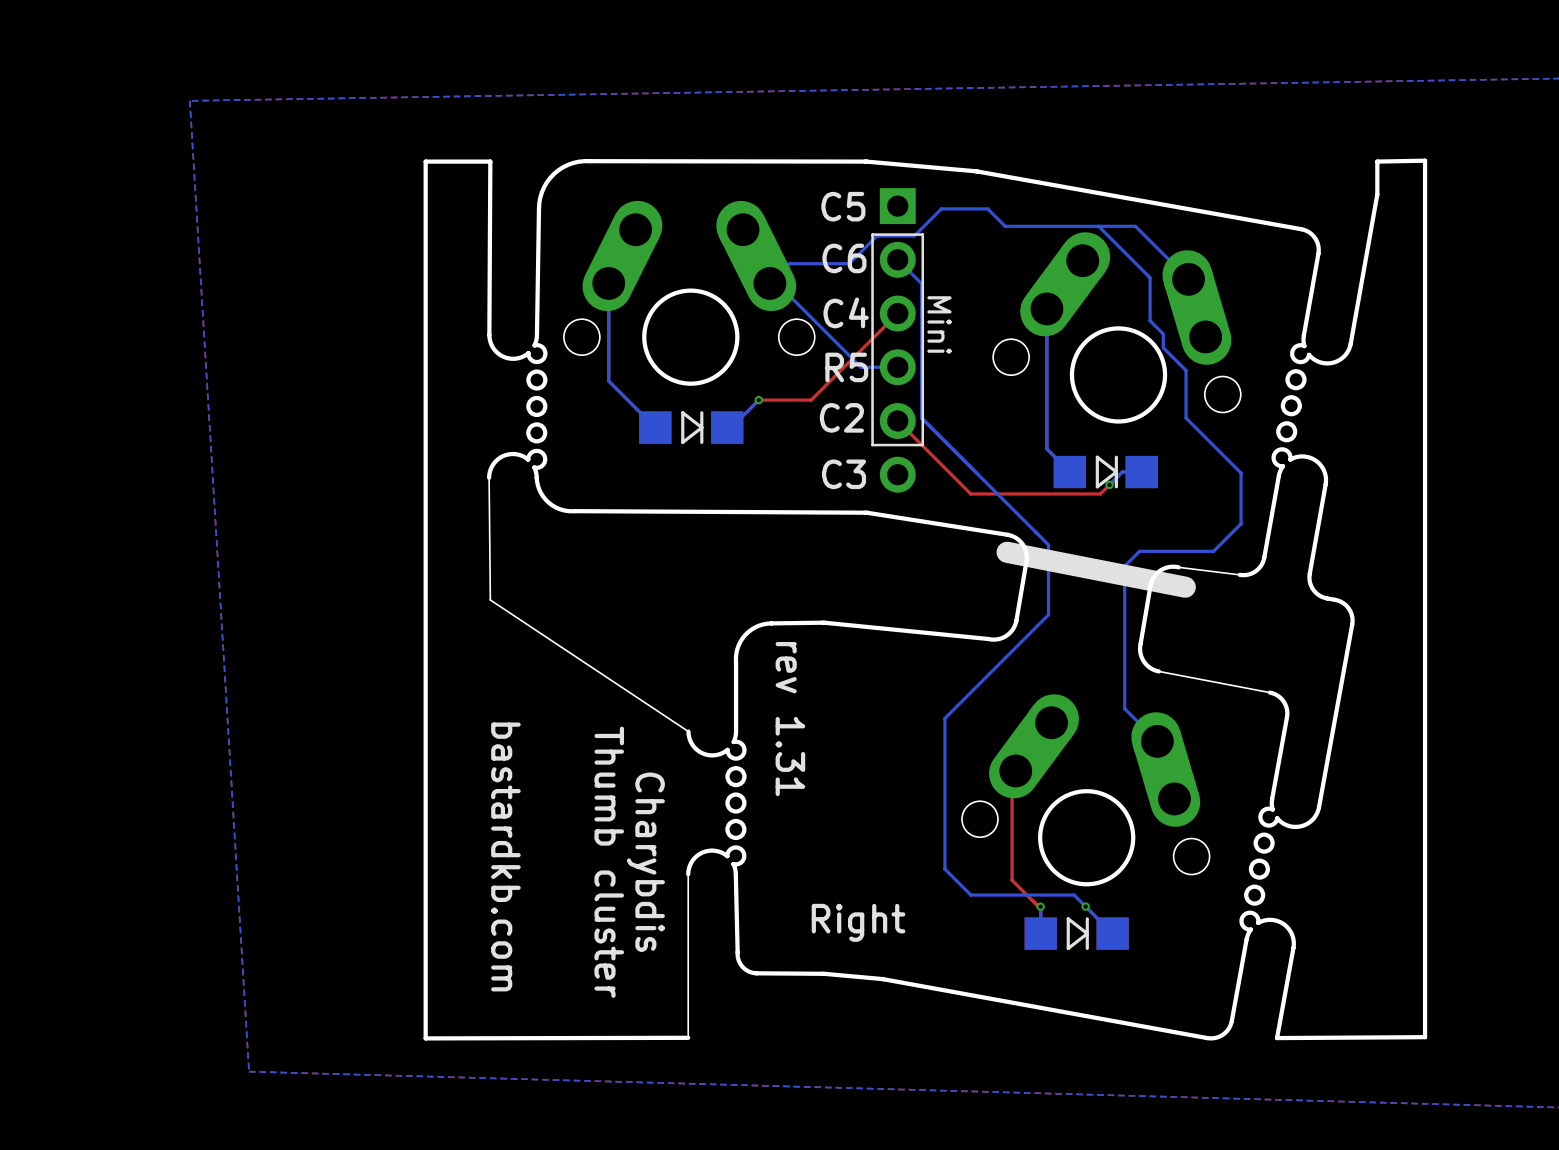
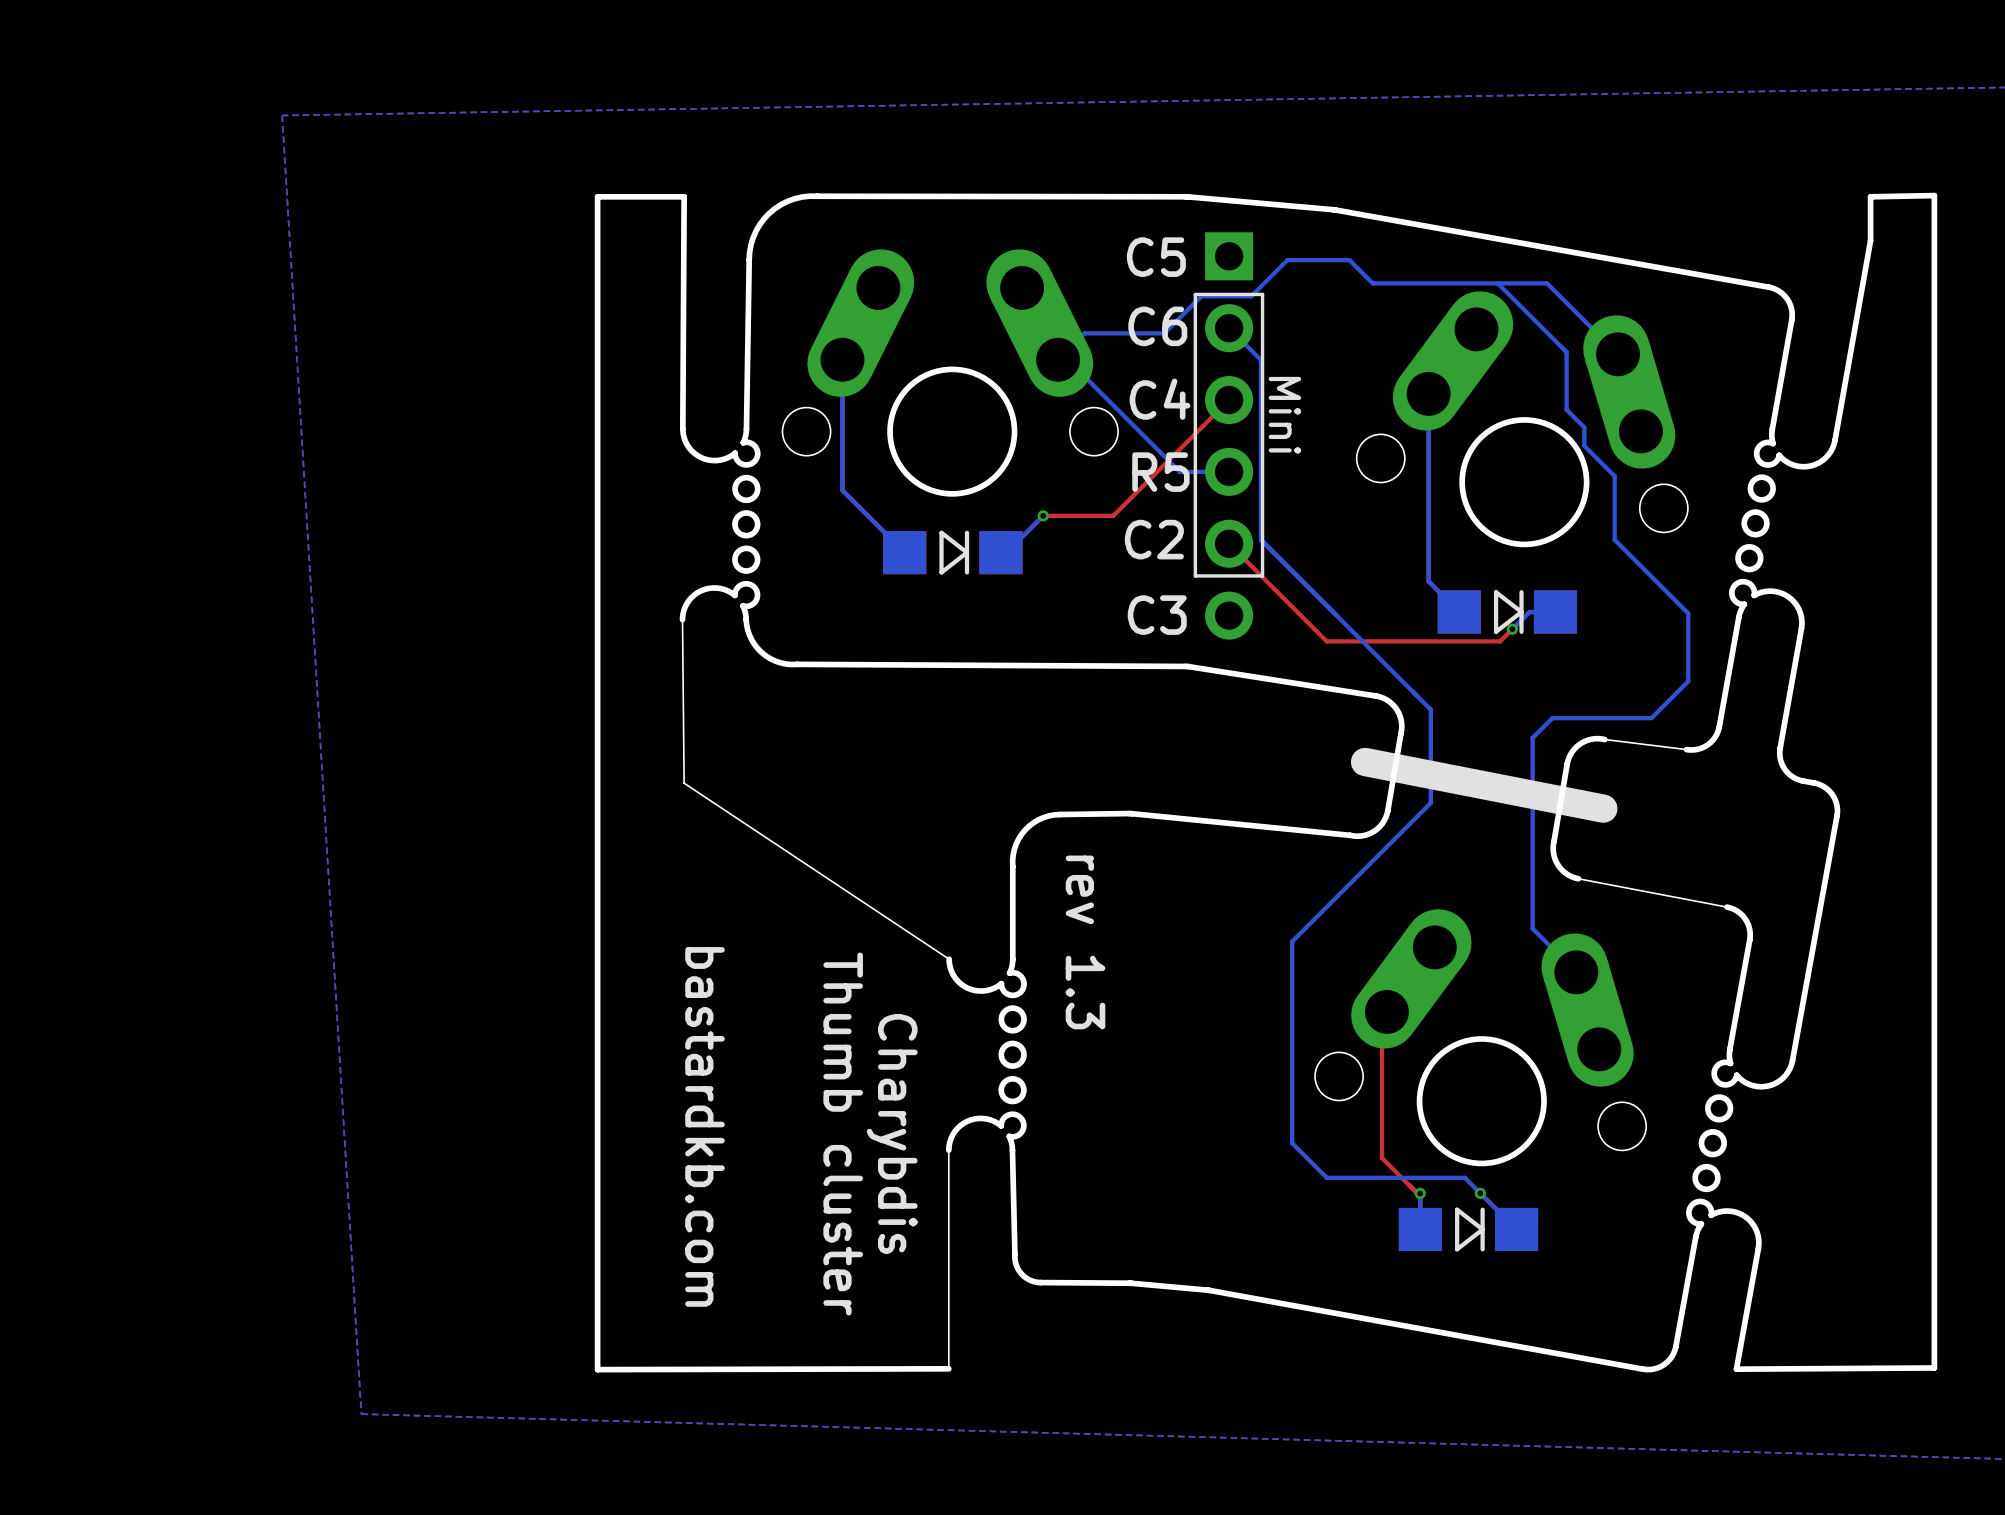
line: (1007, 552) (1185, 587) -> (1365, 761) (1603, 808)
text: rev 1.31 (790, 719) -> rev 1.3 (1085, 942)
text: Right (858, 922) -> none

